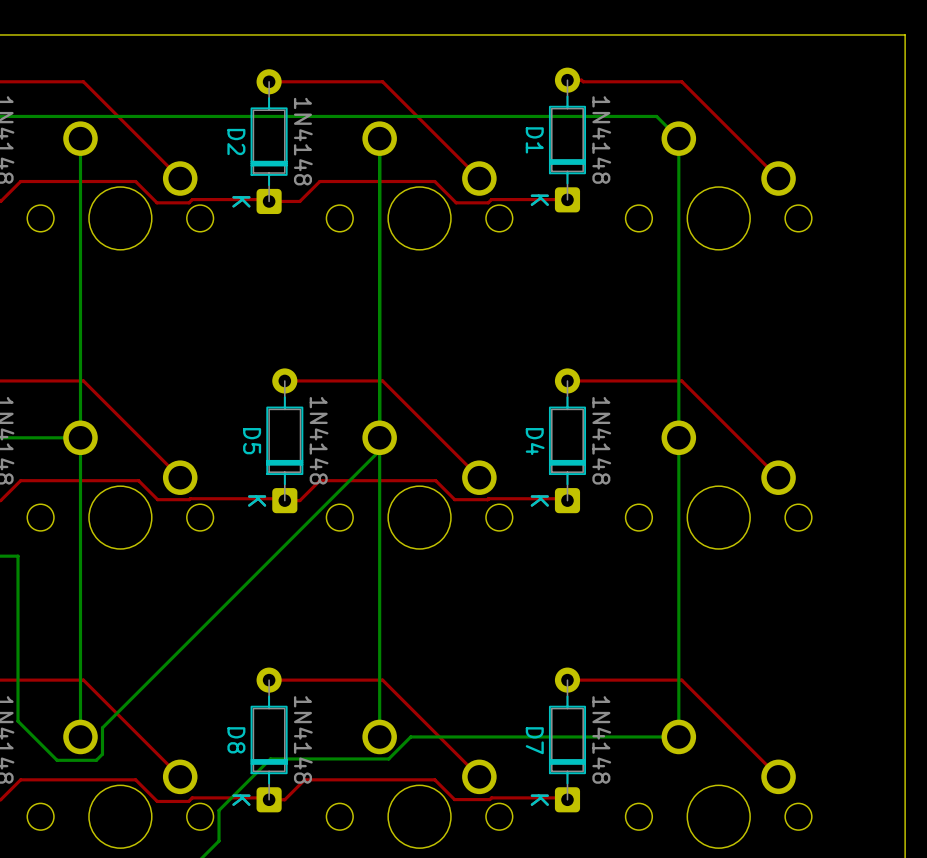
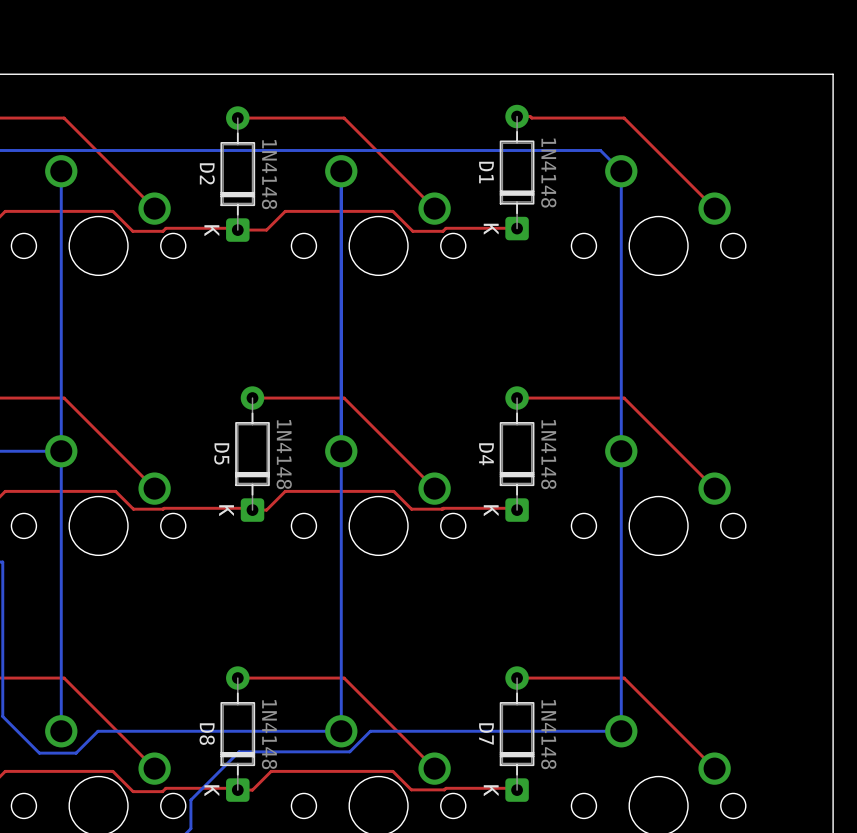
bottom track: (379, 450) (102, 727) (102, 754) -> (341, 731) (97, 731) (81, 747)

